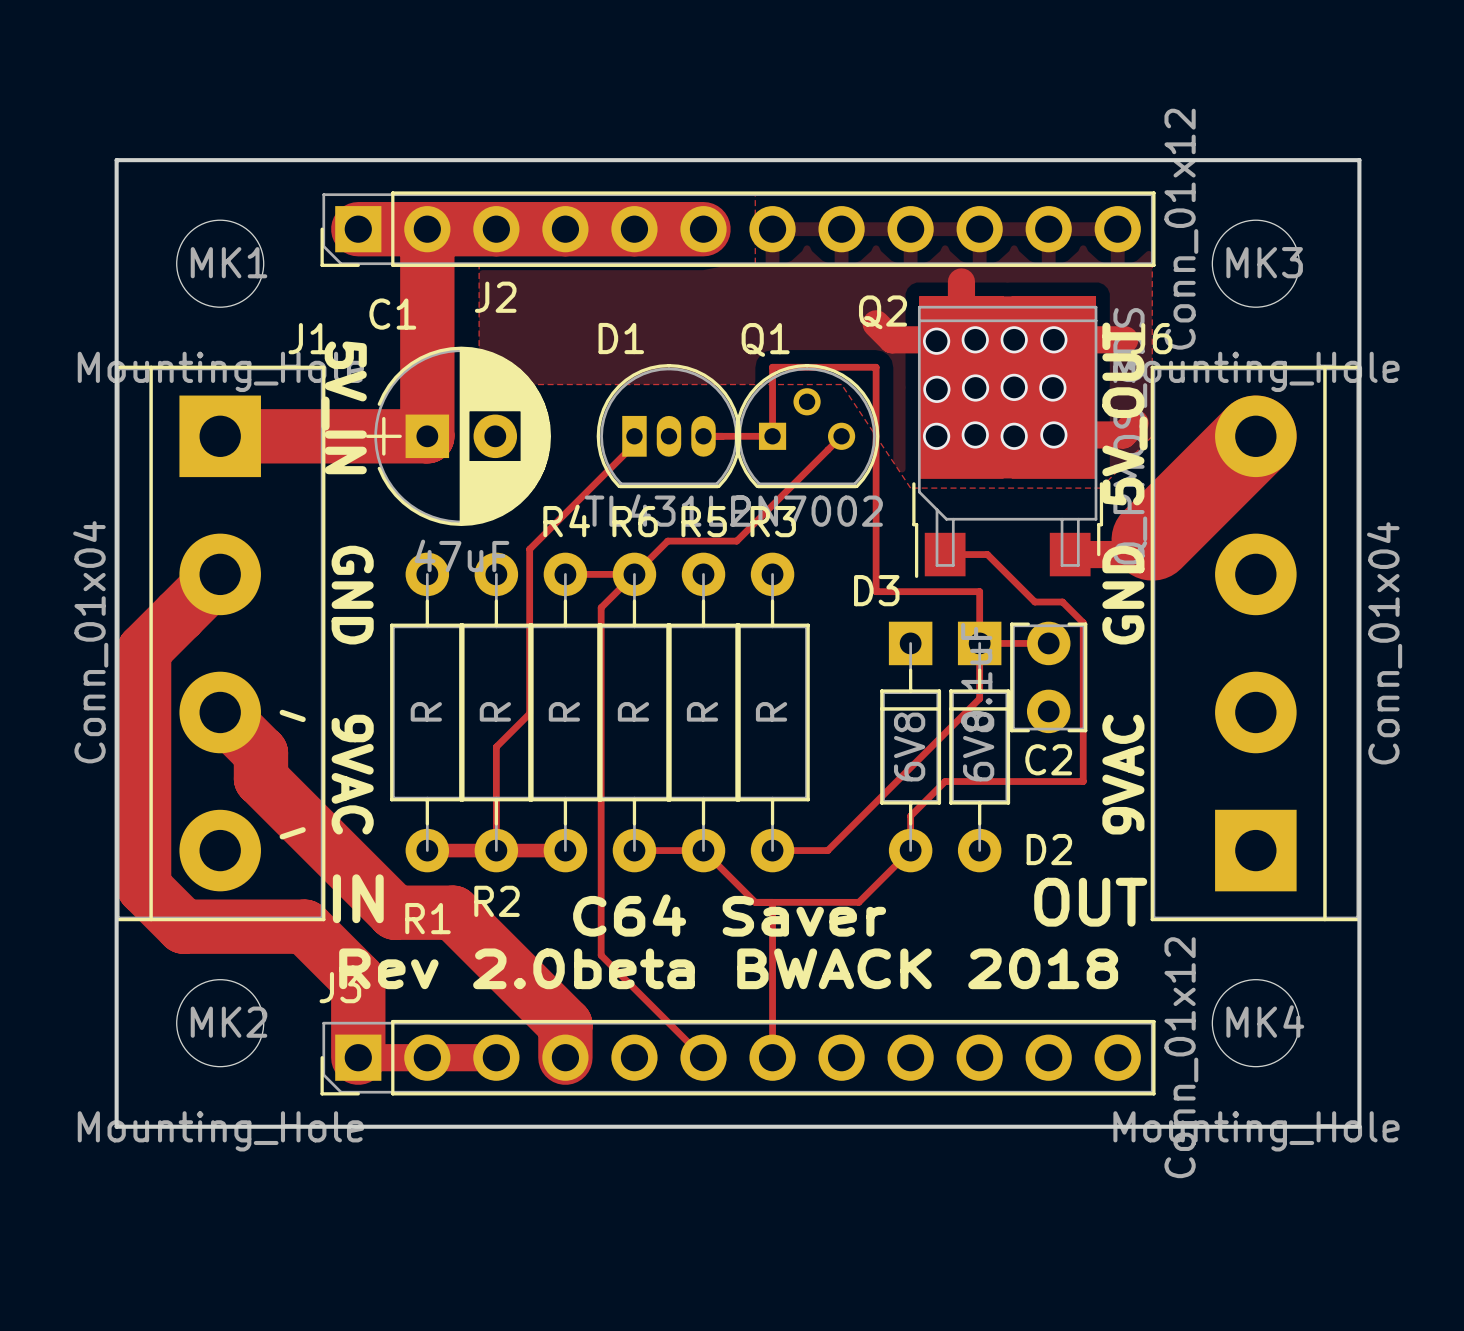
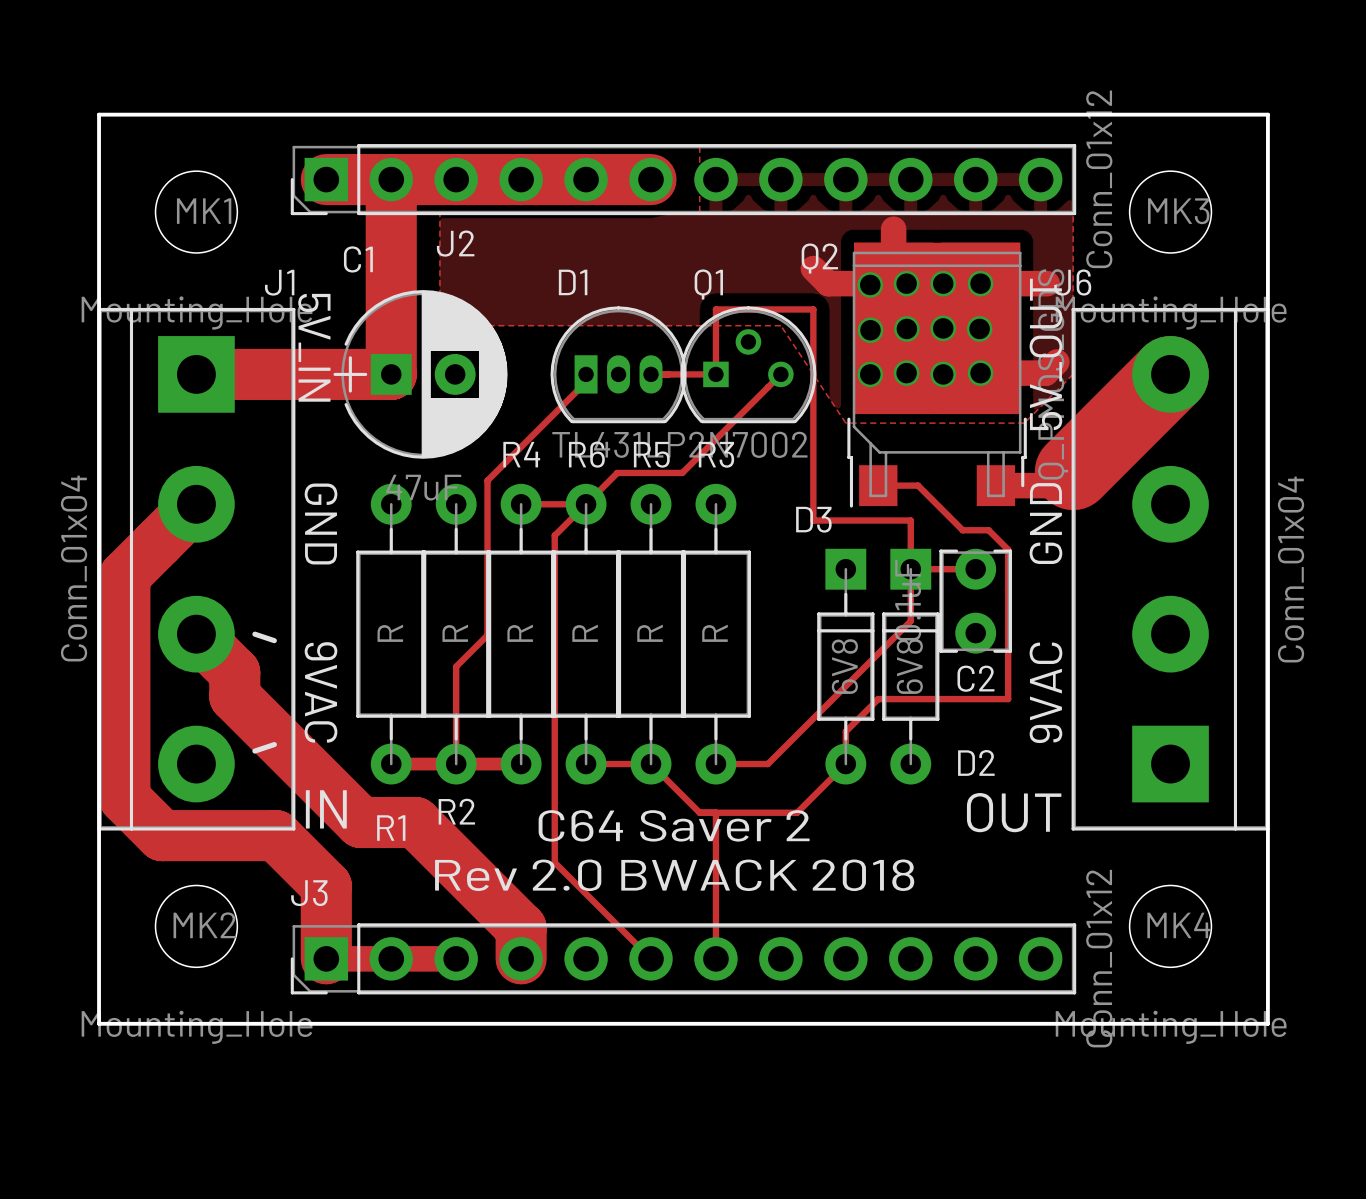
text: C64 Saver (729, 915) -> C64 Saver 2 (674, 825)
text: Rev 2.0beta BWACK 2018 (728, 968) -> Rev 2.0 BWACK 2018 (674, 875)

